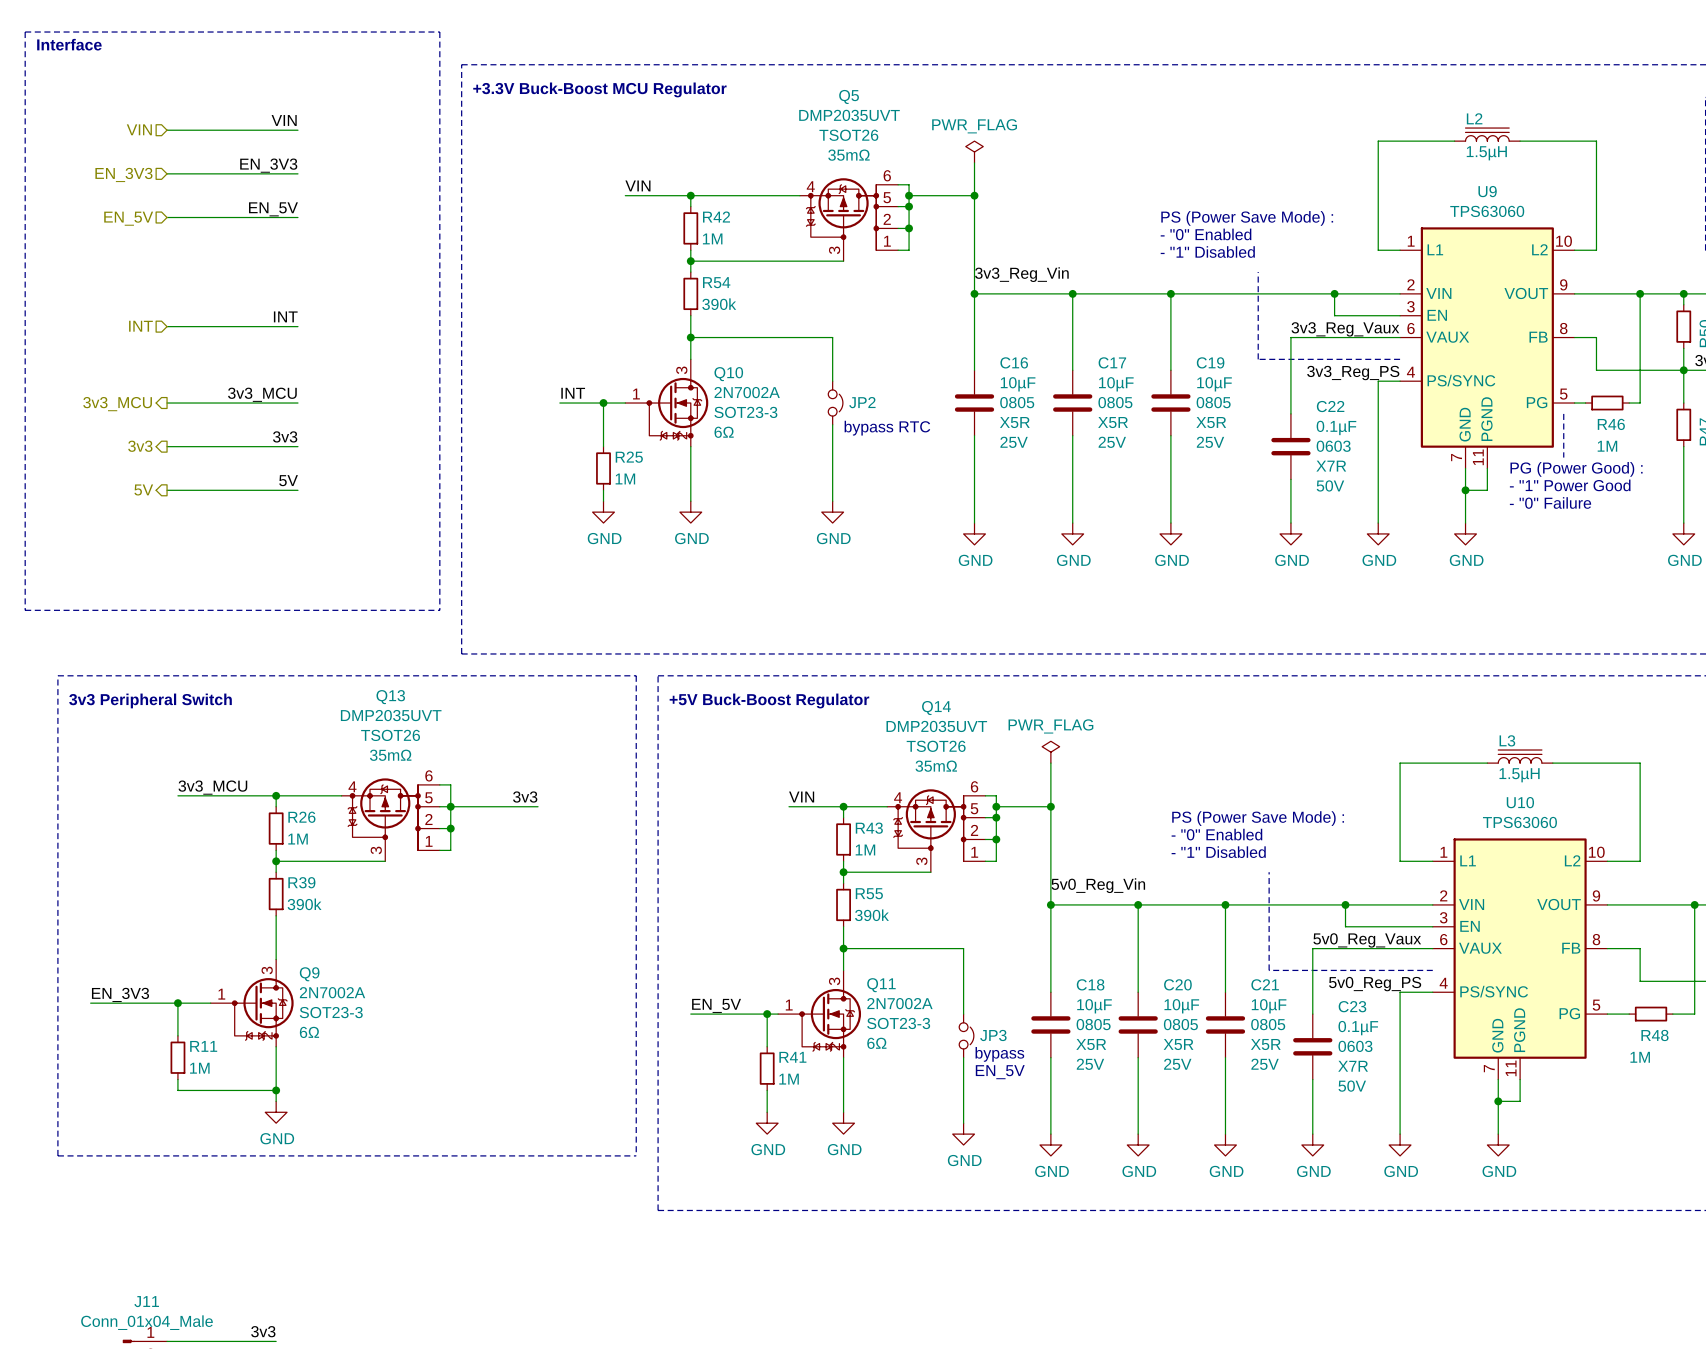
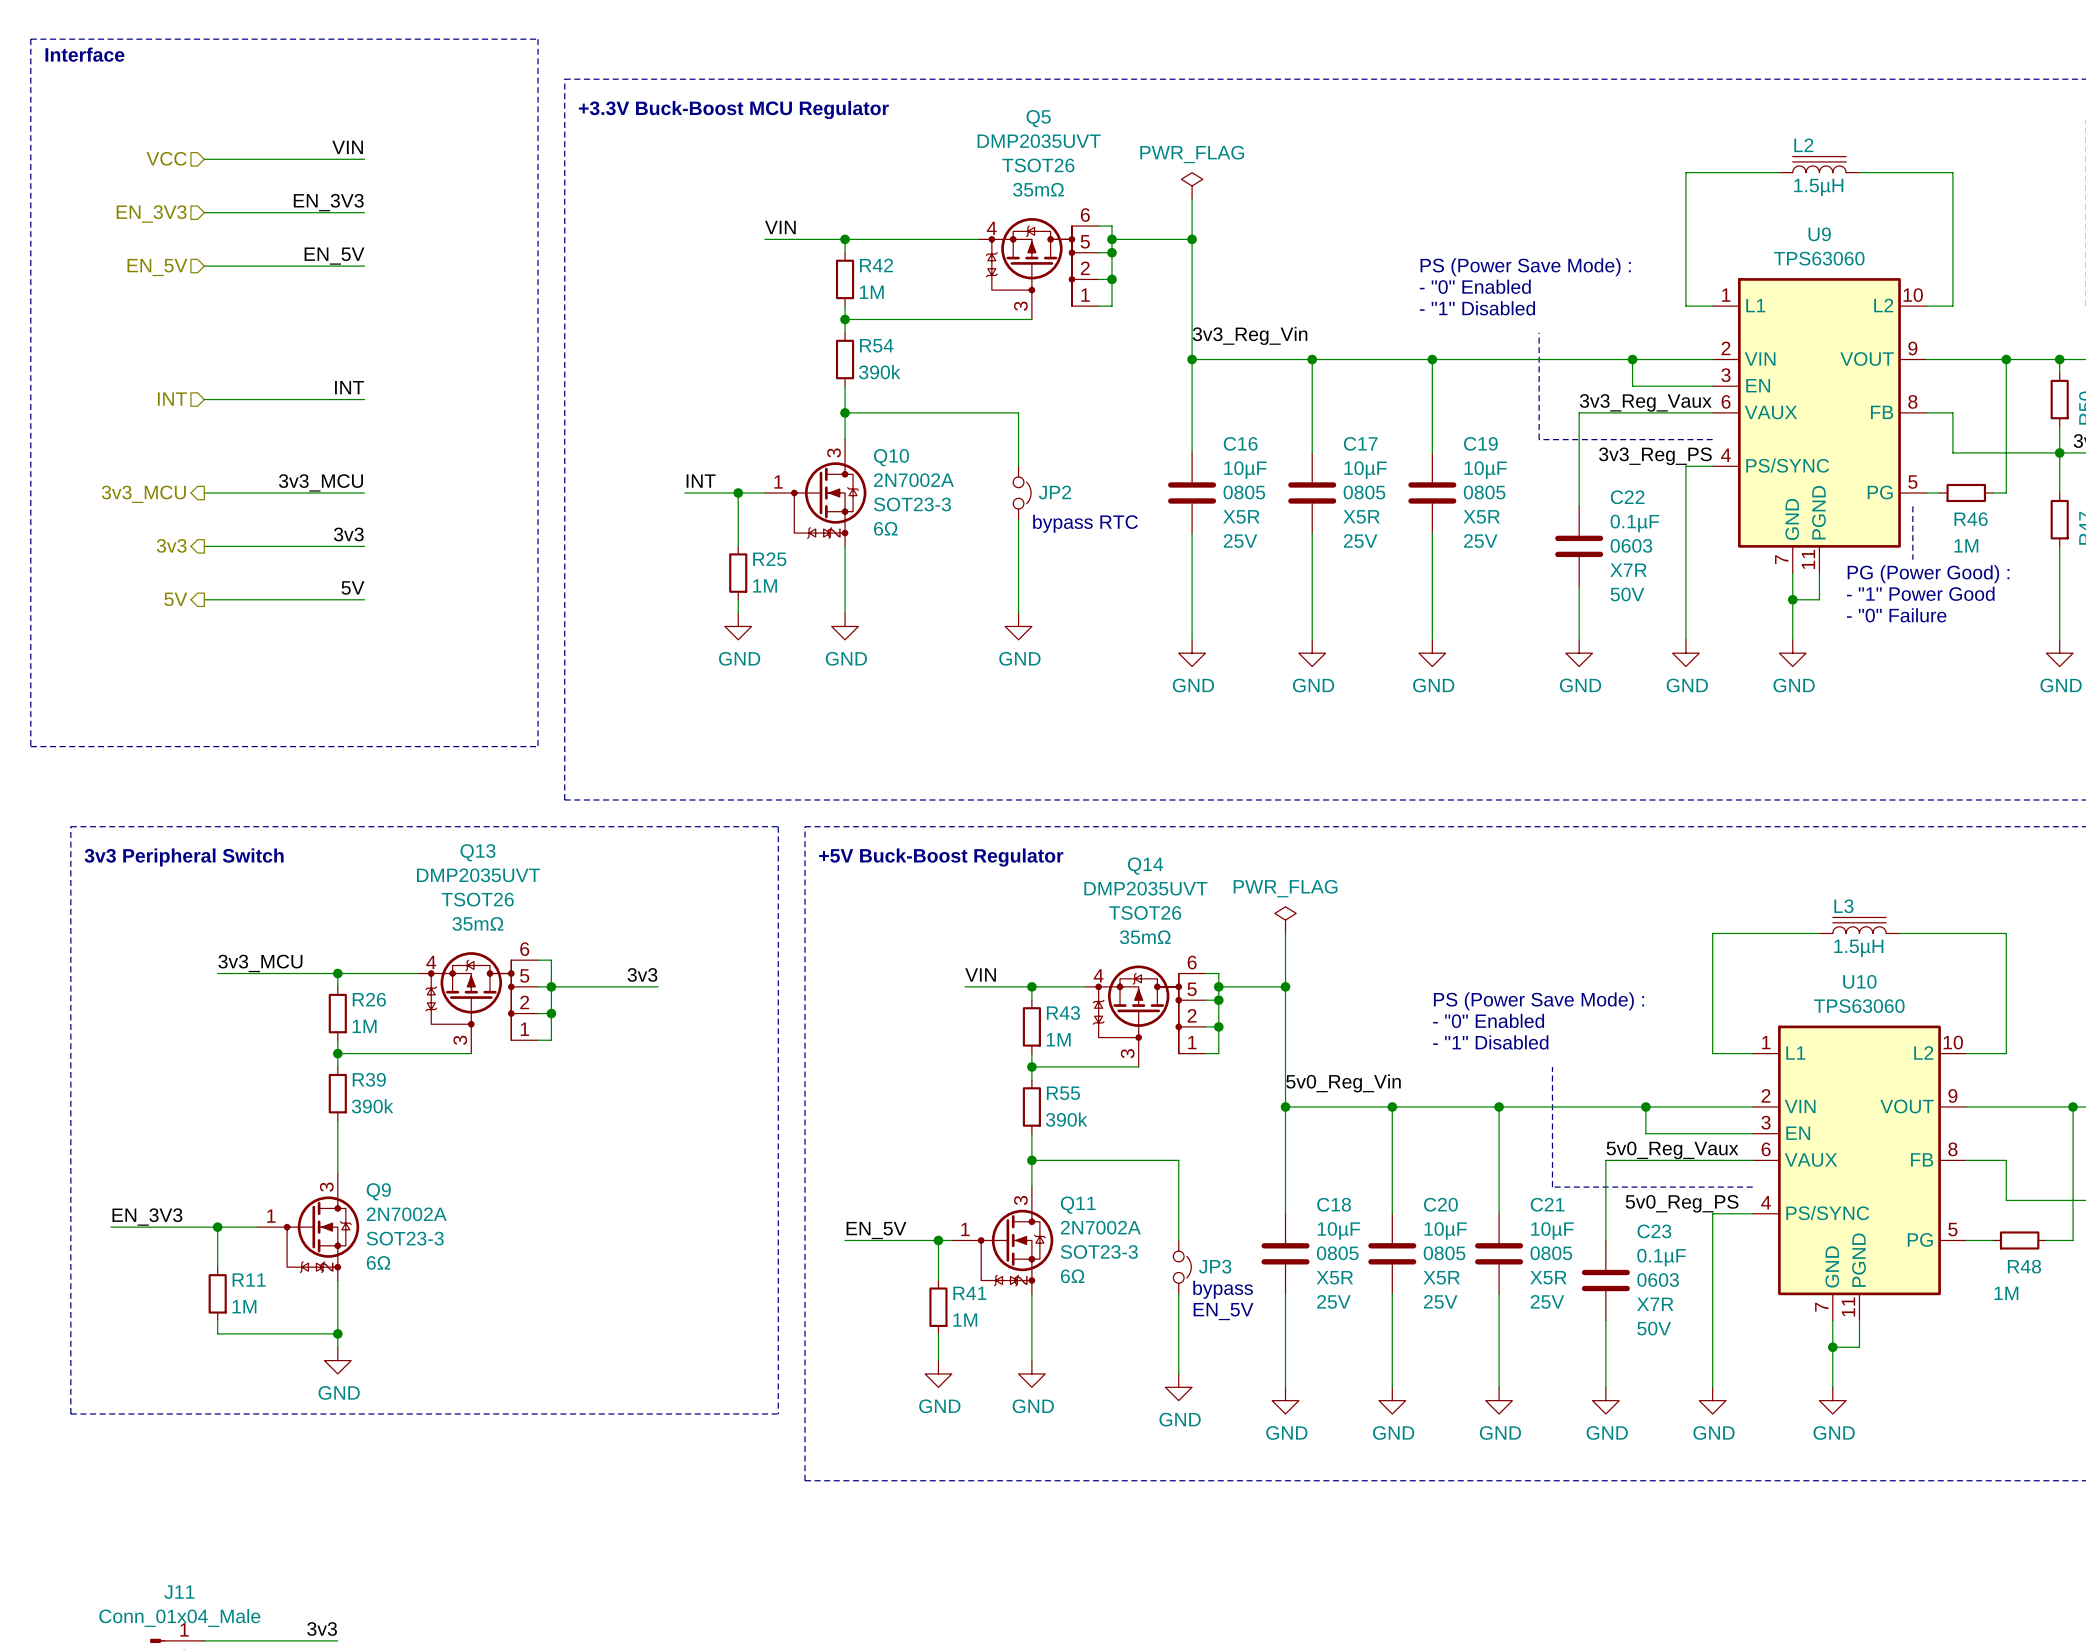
hierarchical label: VIN (139, 129) -> VCC (166, 158)

